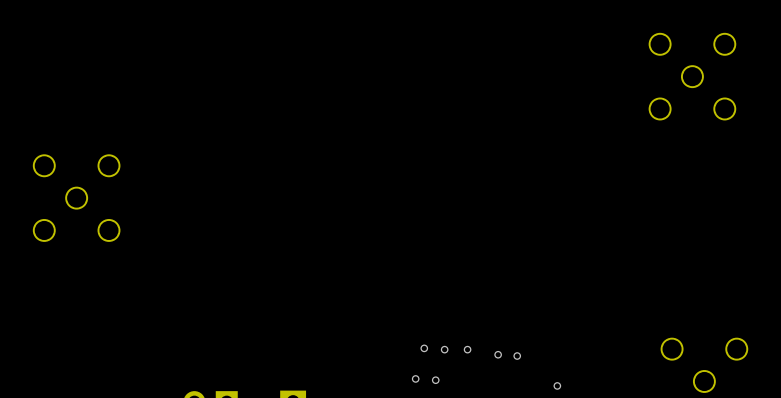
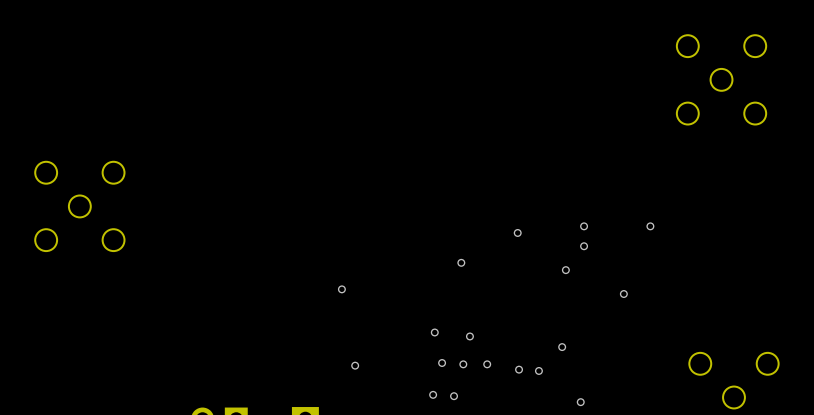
via: none -> (584, 226)
via: none -> (650, 226)
via: none -> (517, 232)
via: none -> (584, 246)
via: none -> (461, 262)
via: none -> (565, 270)
via: none -> (341, 289)
via: none -> (623, 294)
via: none -> (434, 332)
via: none -> (469, 336)
via: none -> (562, 347)
via: none -> (355, 365)

